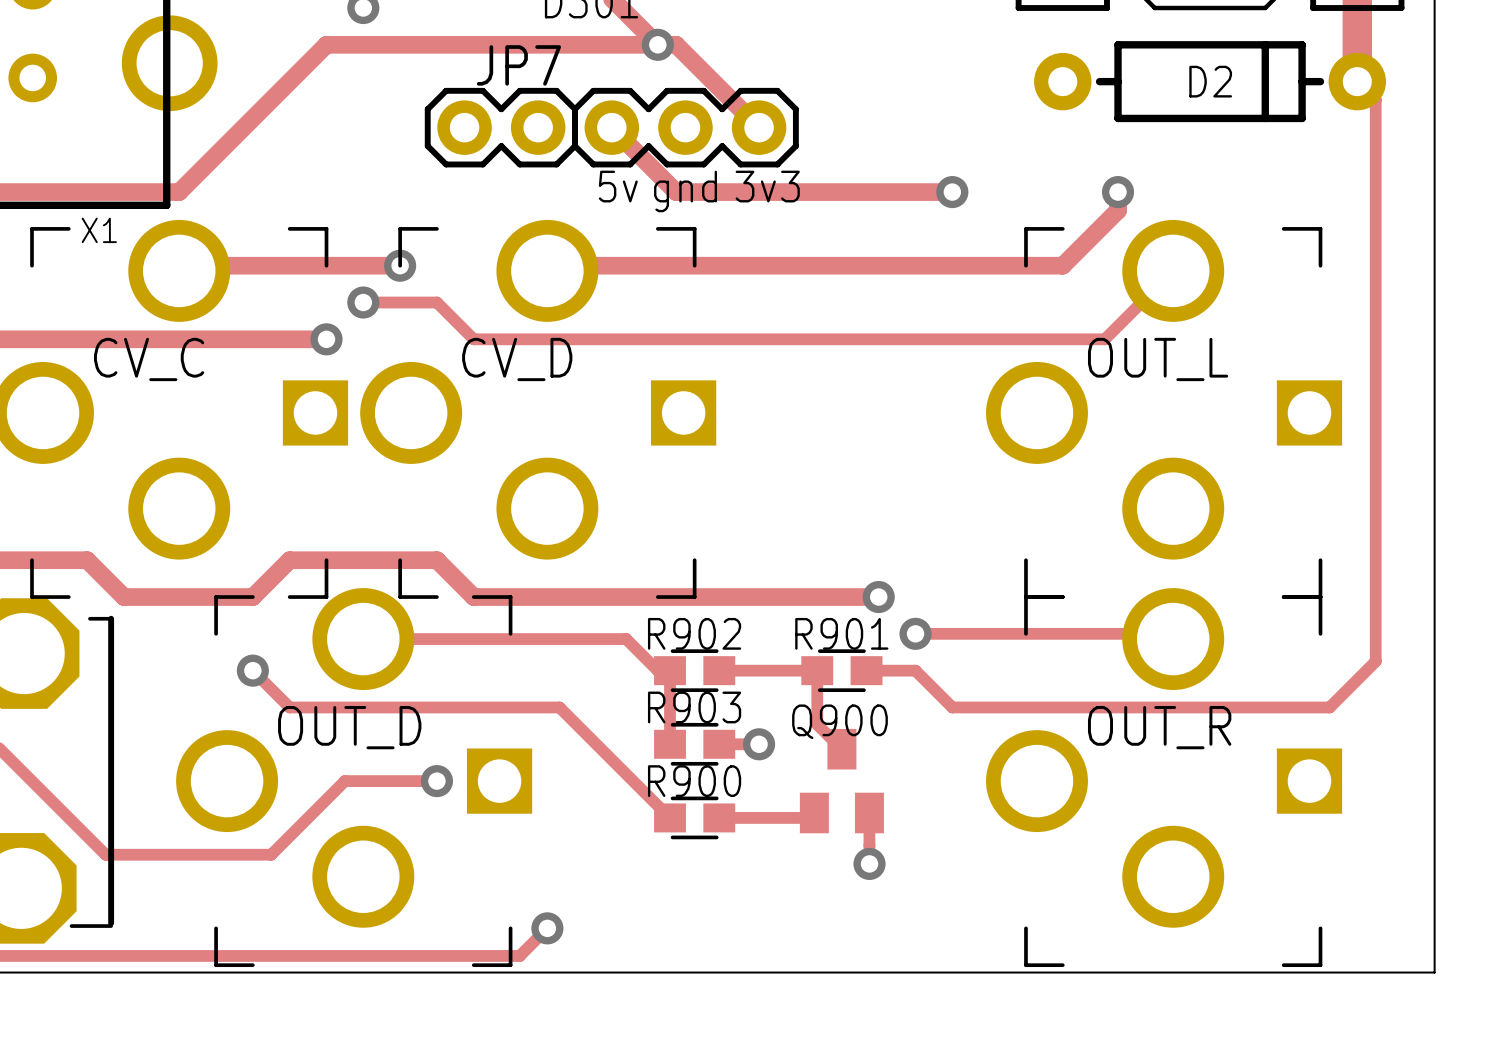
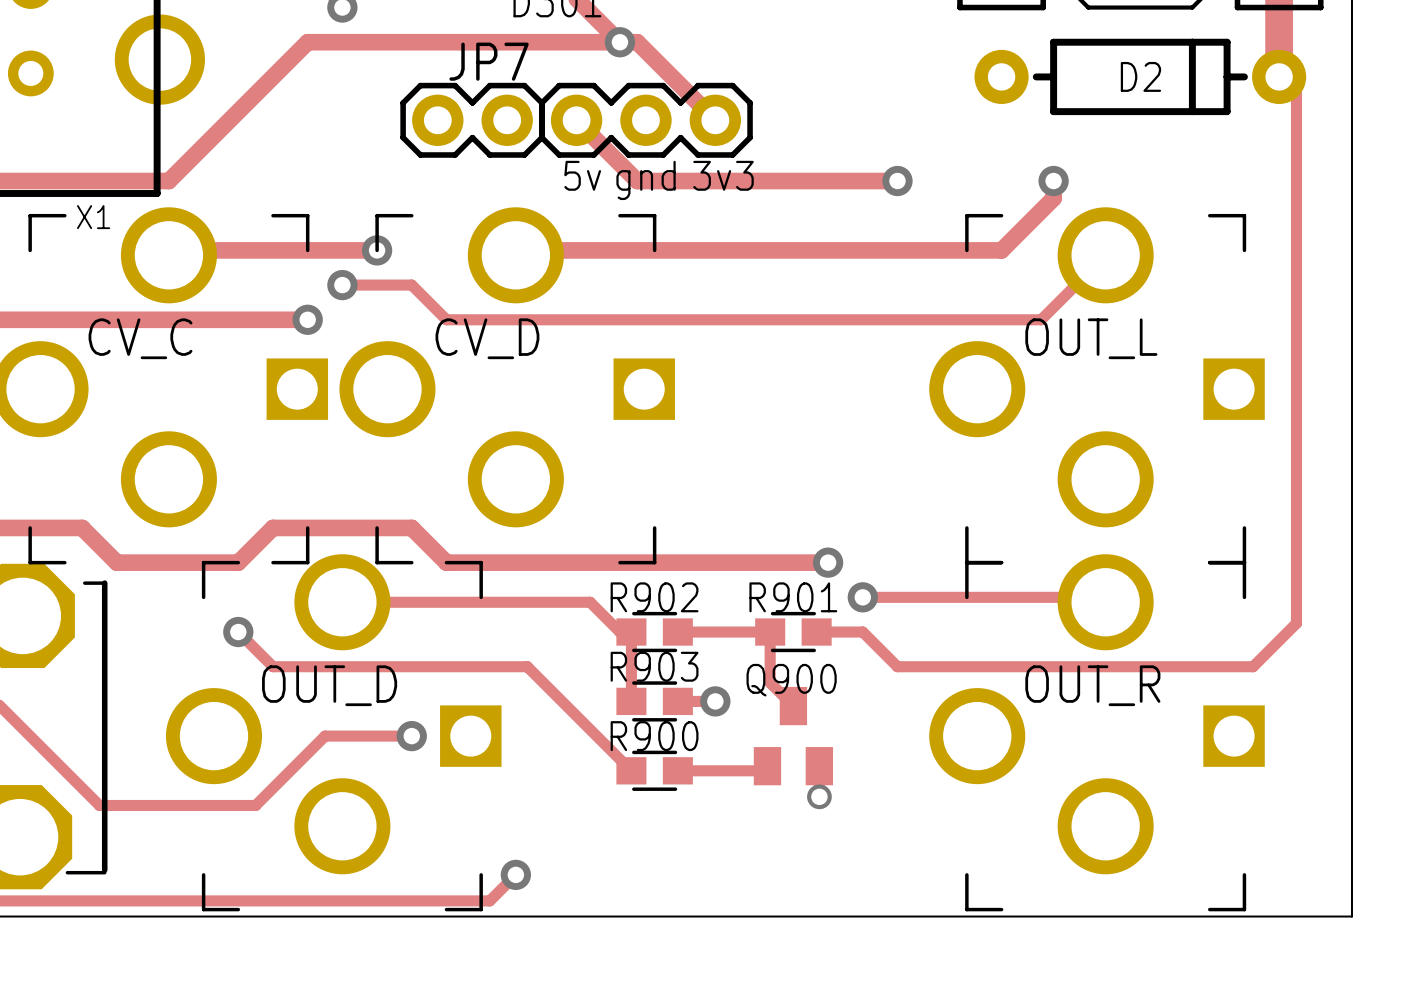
via position: (869, 863) -> (819, 796)

